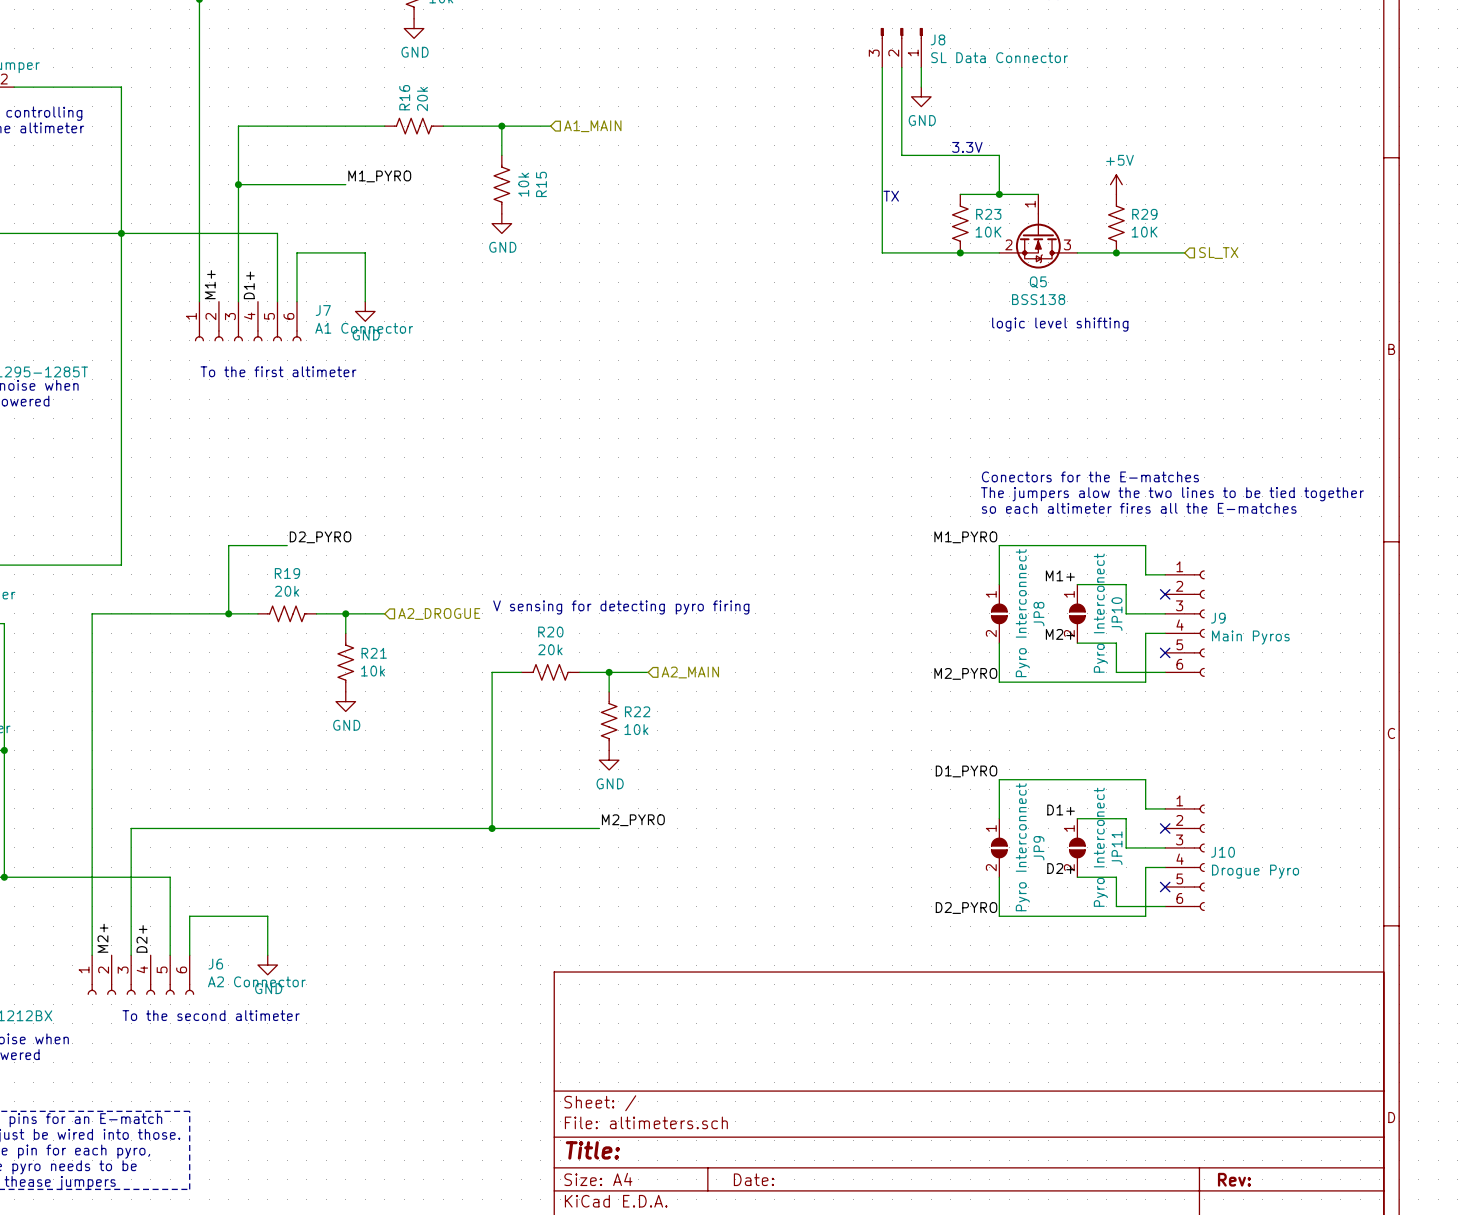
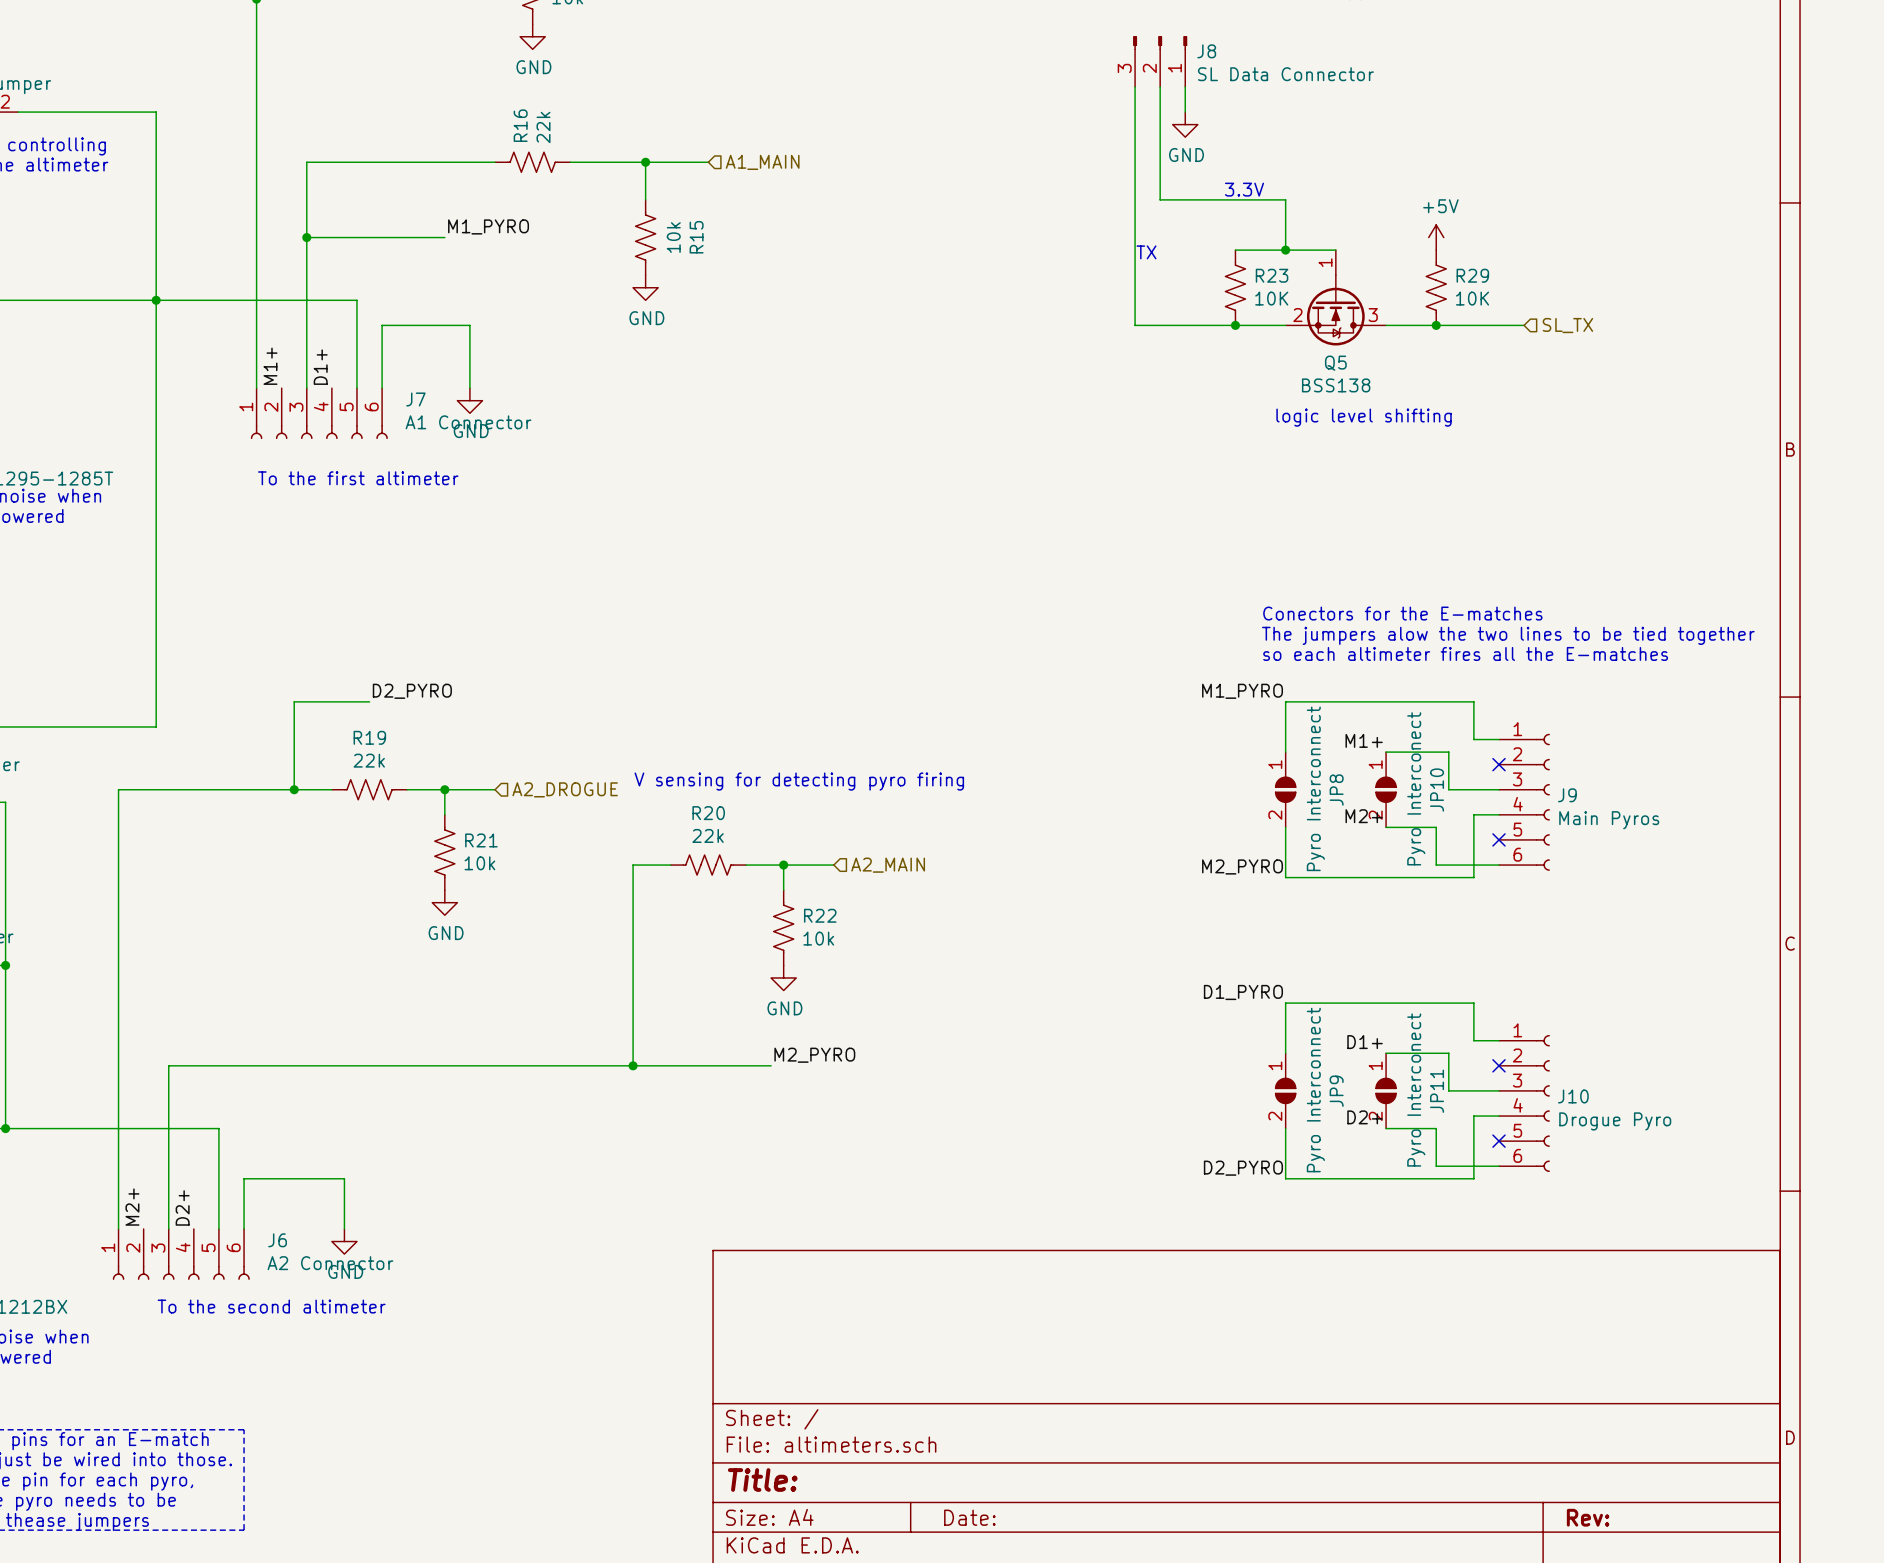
R16 value: 20k (422, 99) -> 22k (543, 127)
R19 value: 20k (287, 591) -> 22k (369, 760)
R20 value: 20k (550, 649) -> 22k (708, 835)

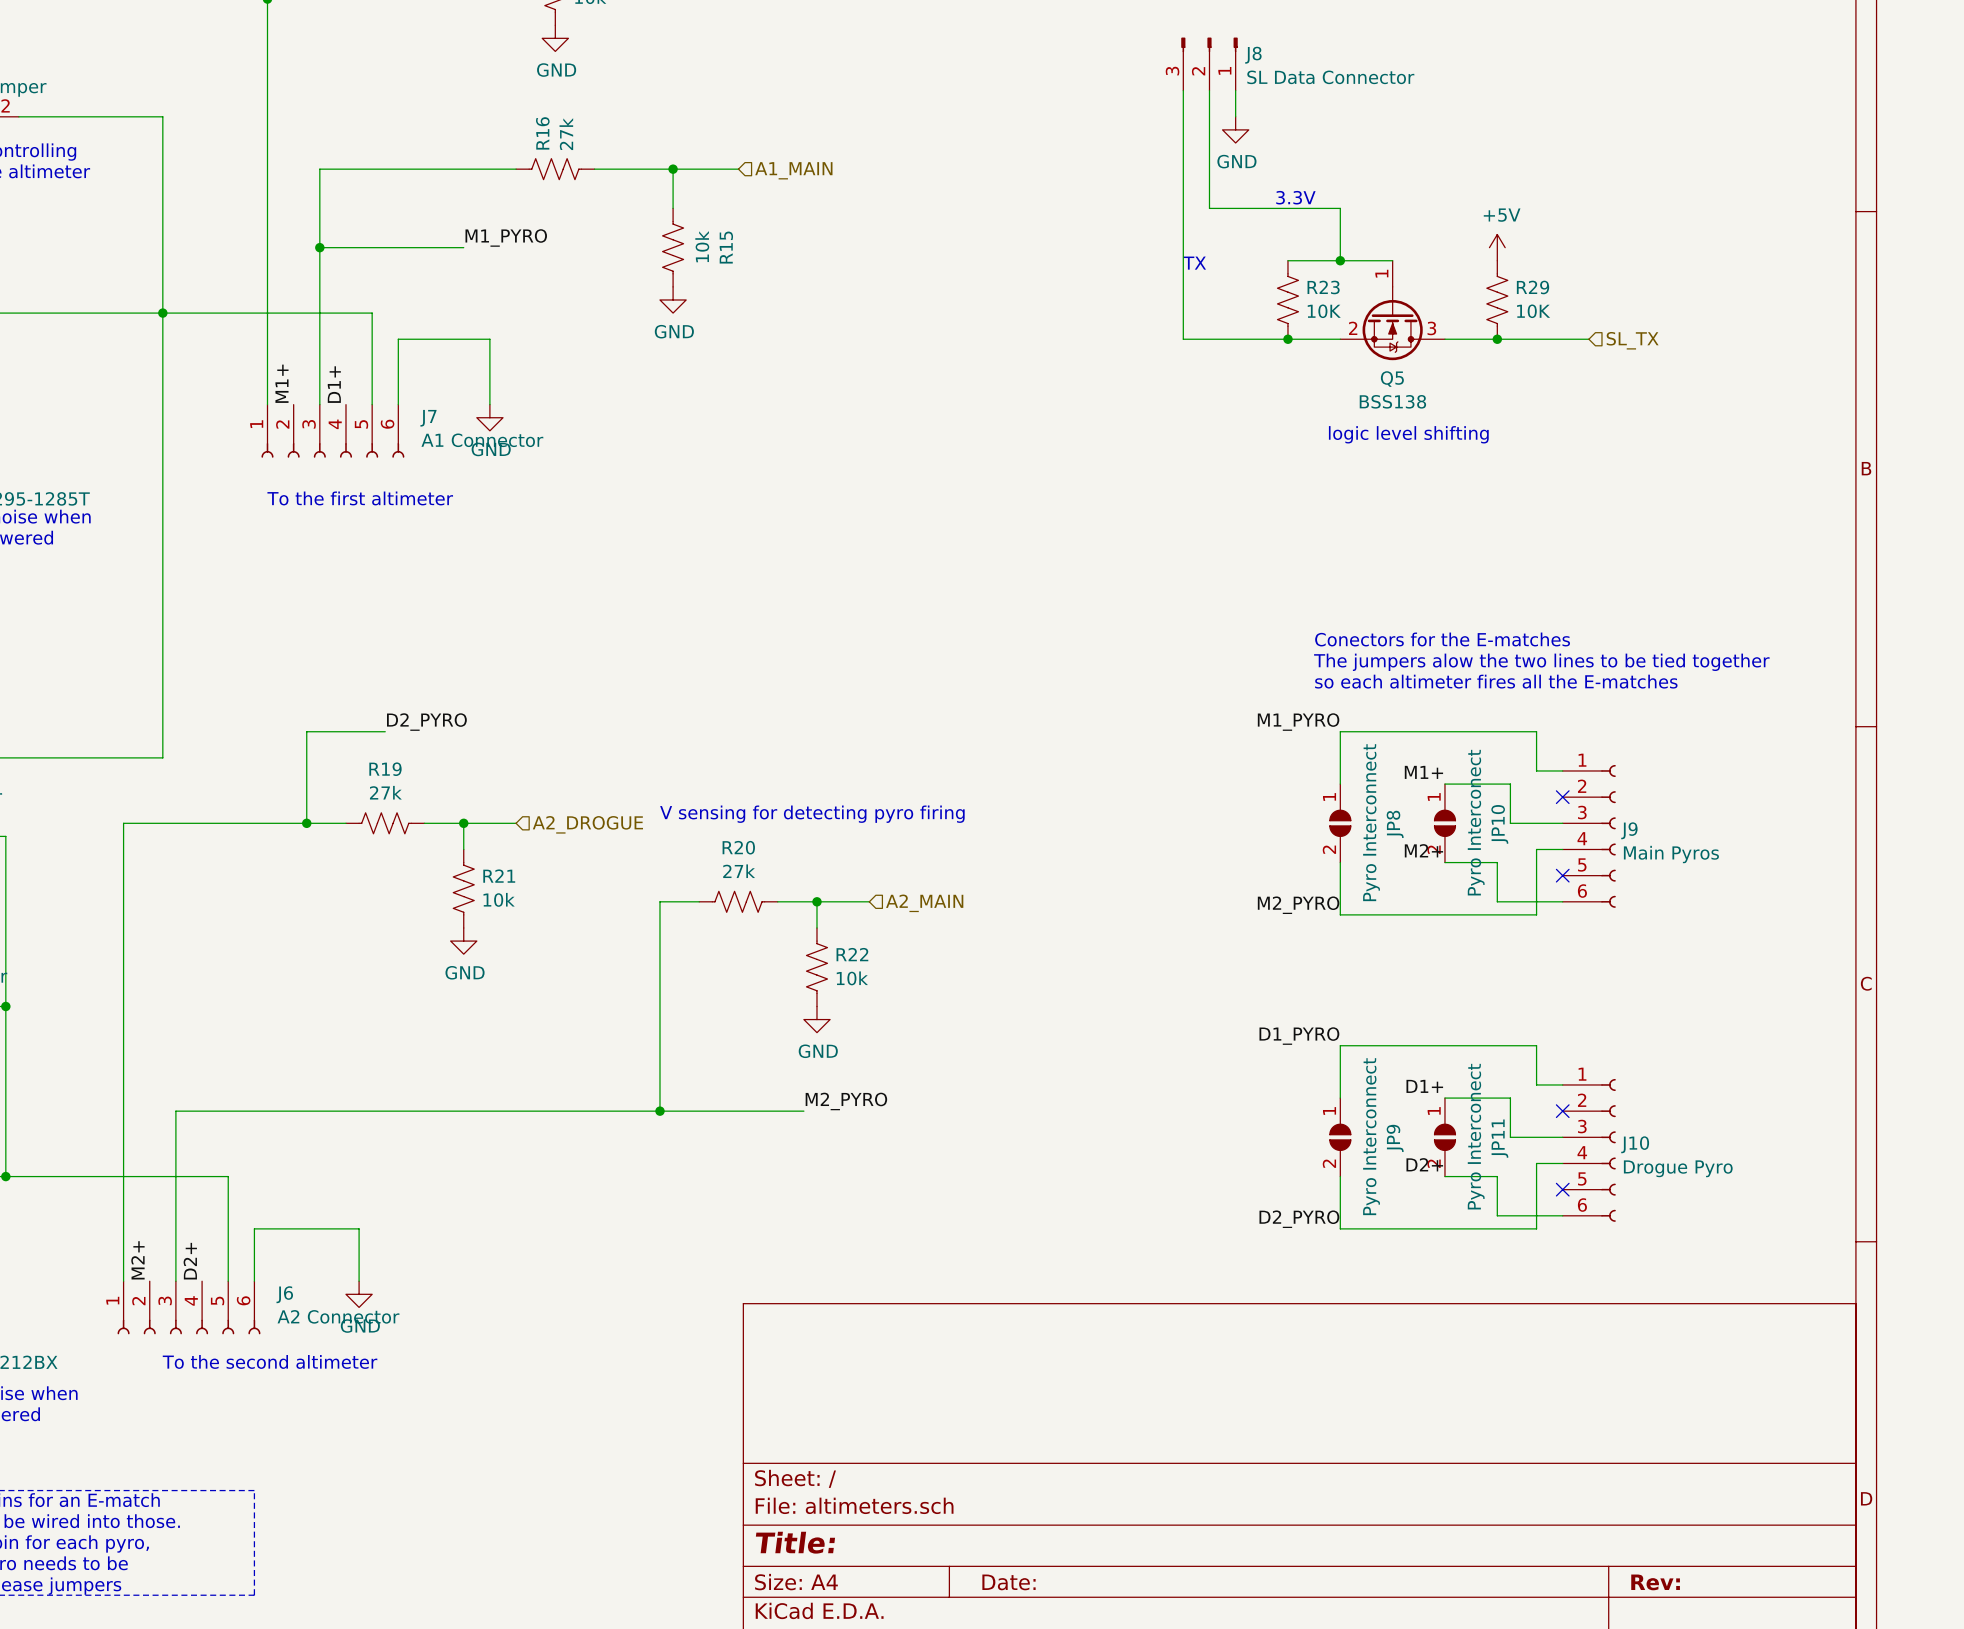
R16 value: 22k (543, 127) -> 27k (566, 134)
R19 value: 22k (369, 760) -> 27k (385, 792)
R20 value: 22k (708, 835) -> 27k (739, 871)

